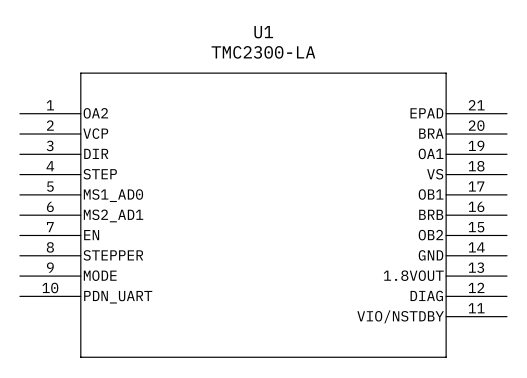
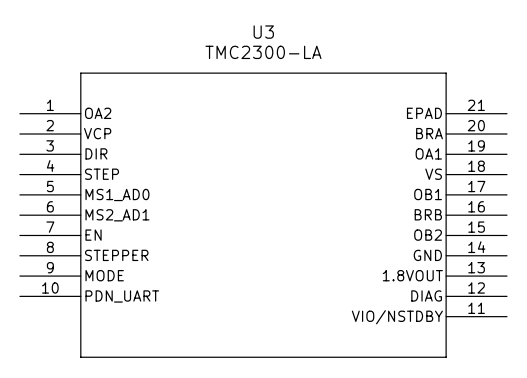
U1 name: U1 (263, 32) -> U3 (263, 32)

